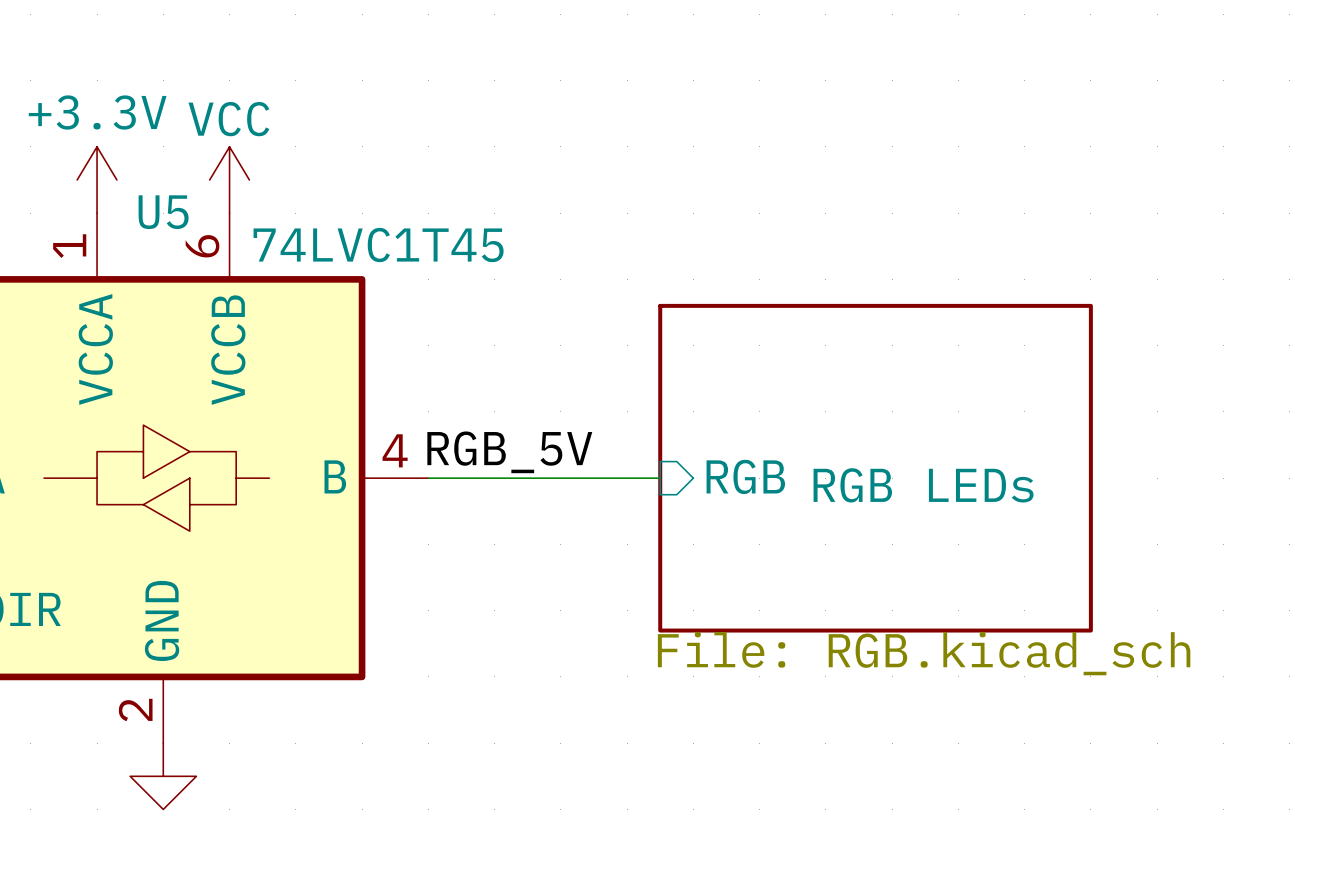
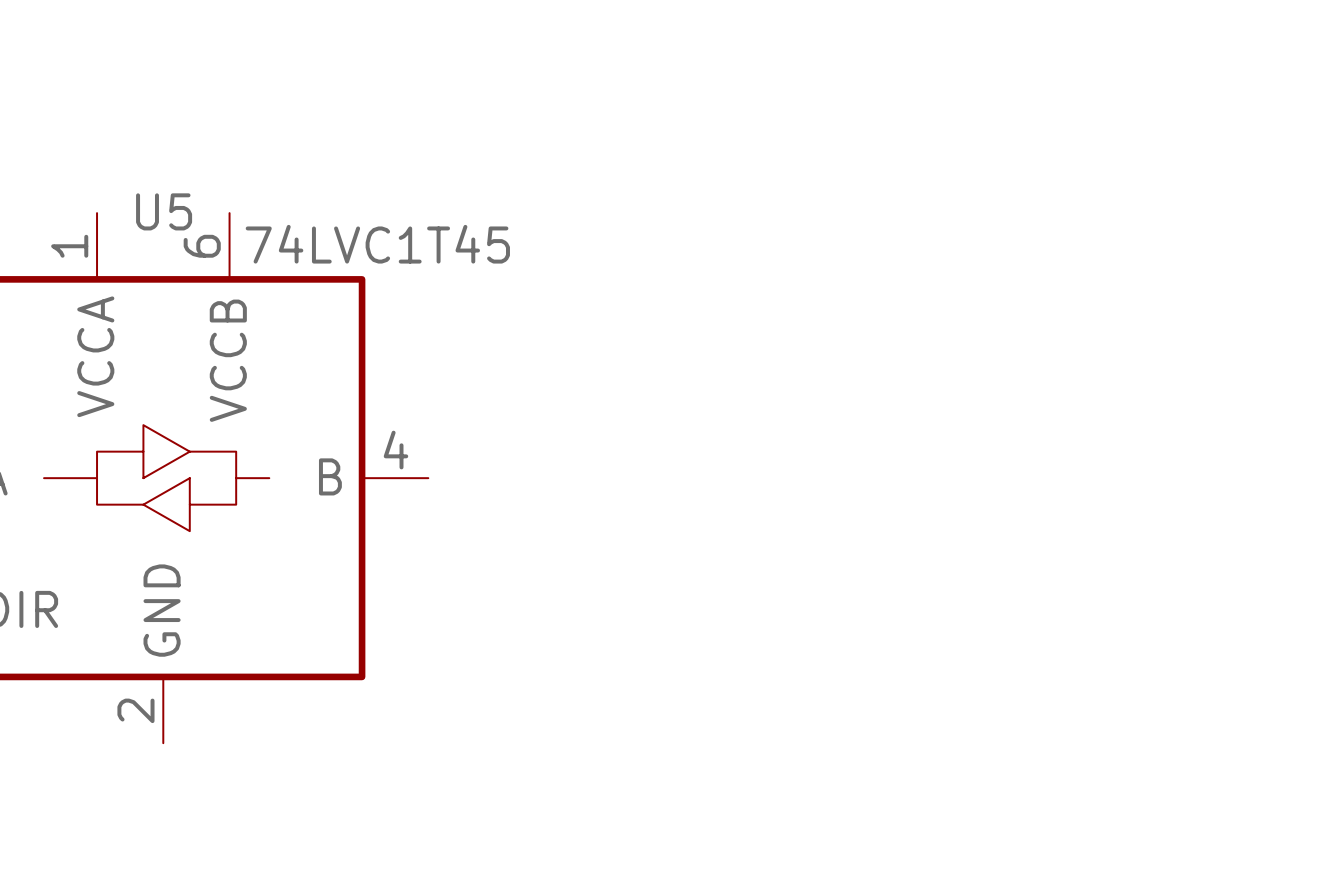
power symbol: +3.3V (97, 180) -> none
power symbol: VCC (229, 180) -> none
label: RGB_5V (509, 452) -> none
sheet RGB LEDs: File: RGB.kicad_sch (875, 468) -> none
sheet pin: RGB (745, 476) -> none
wire: (428, 478) (660, 478) -> none
power symbol: (163, 776) -> none

